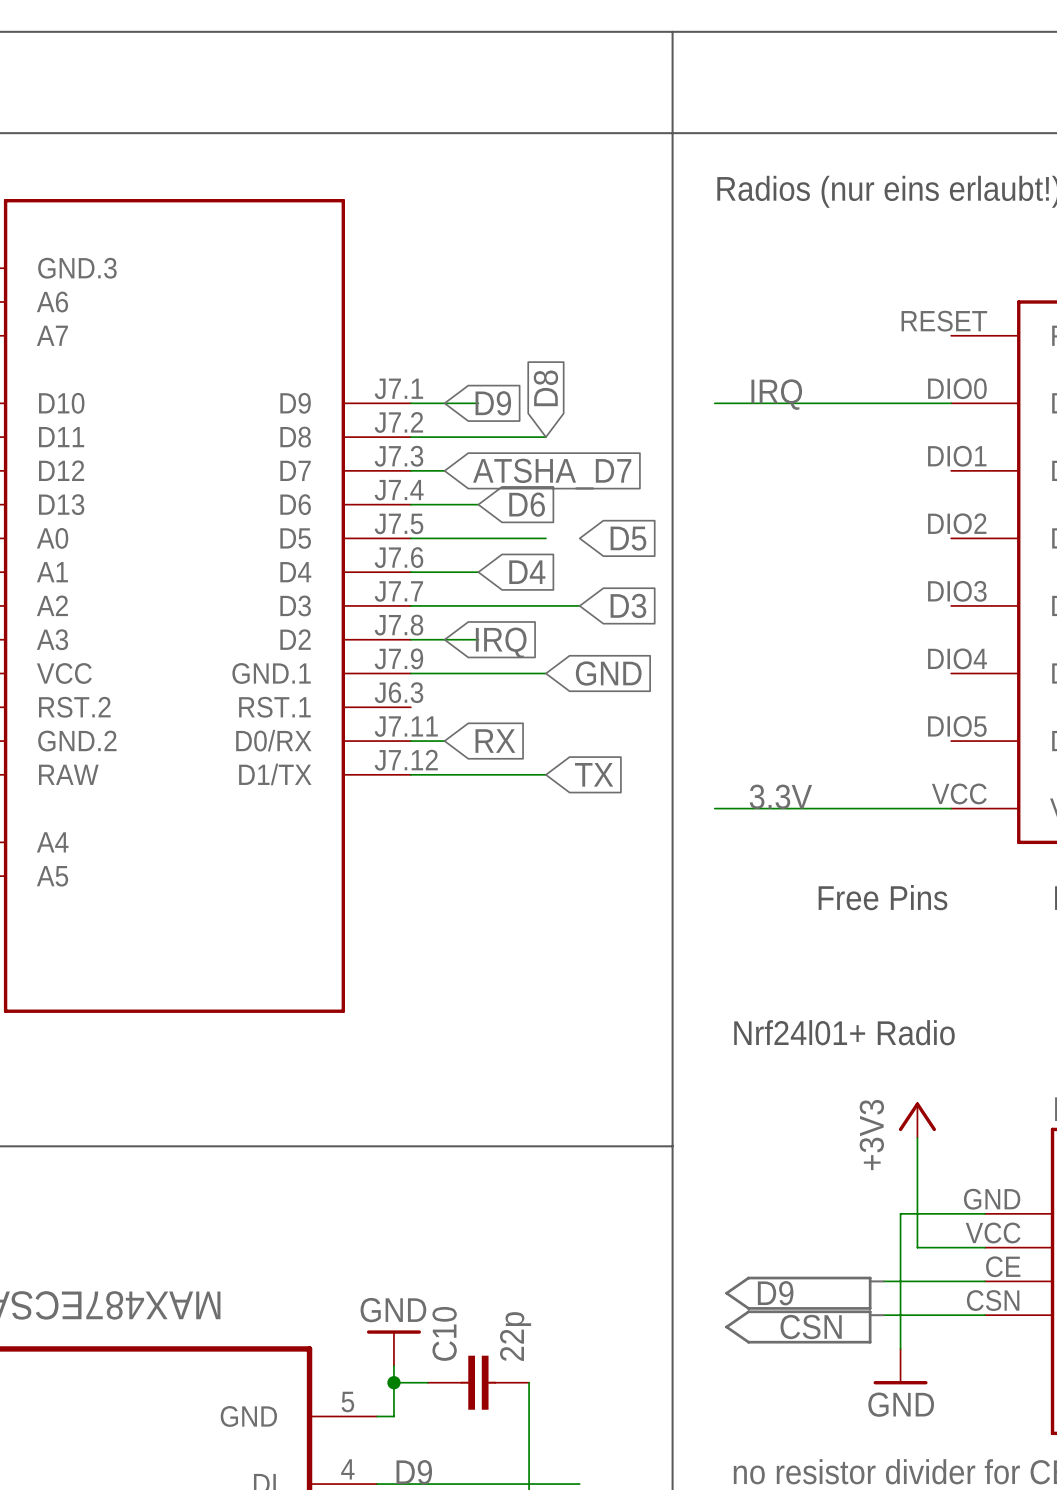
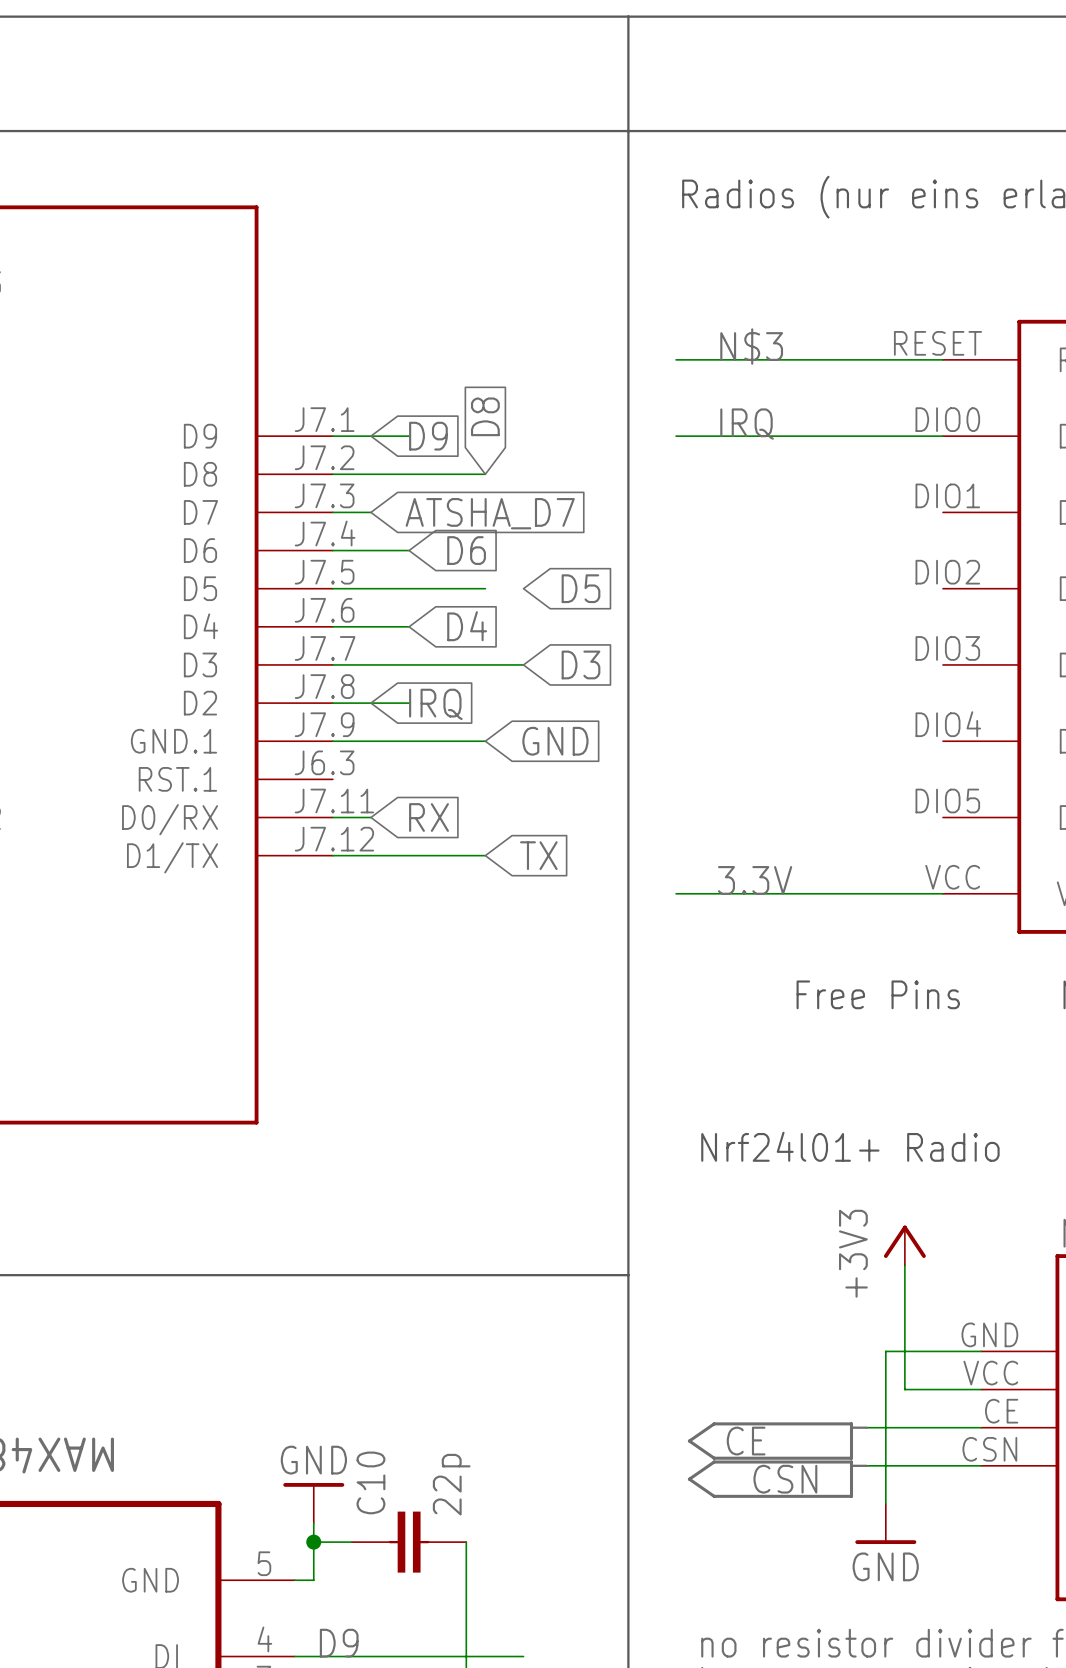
label: none -> N$3 (751, 346)
wire: none -> (676, 359) (943, 359)
label: D9 (775, 1293) -> CE (746, 1441)

